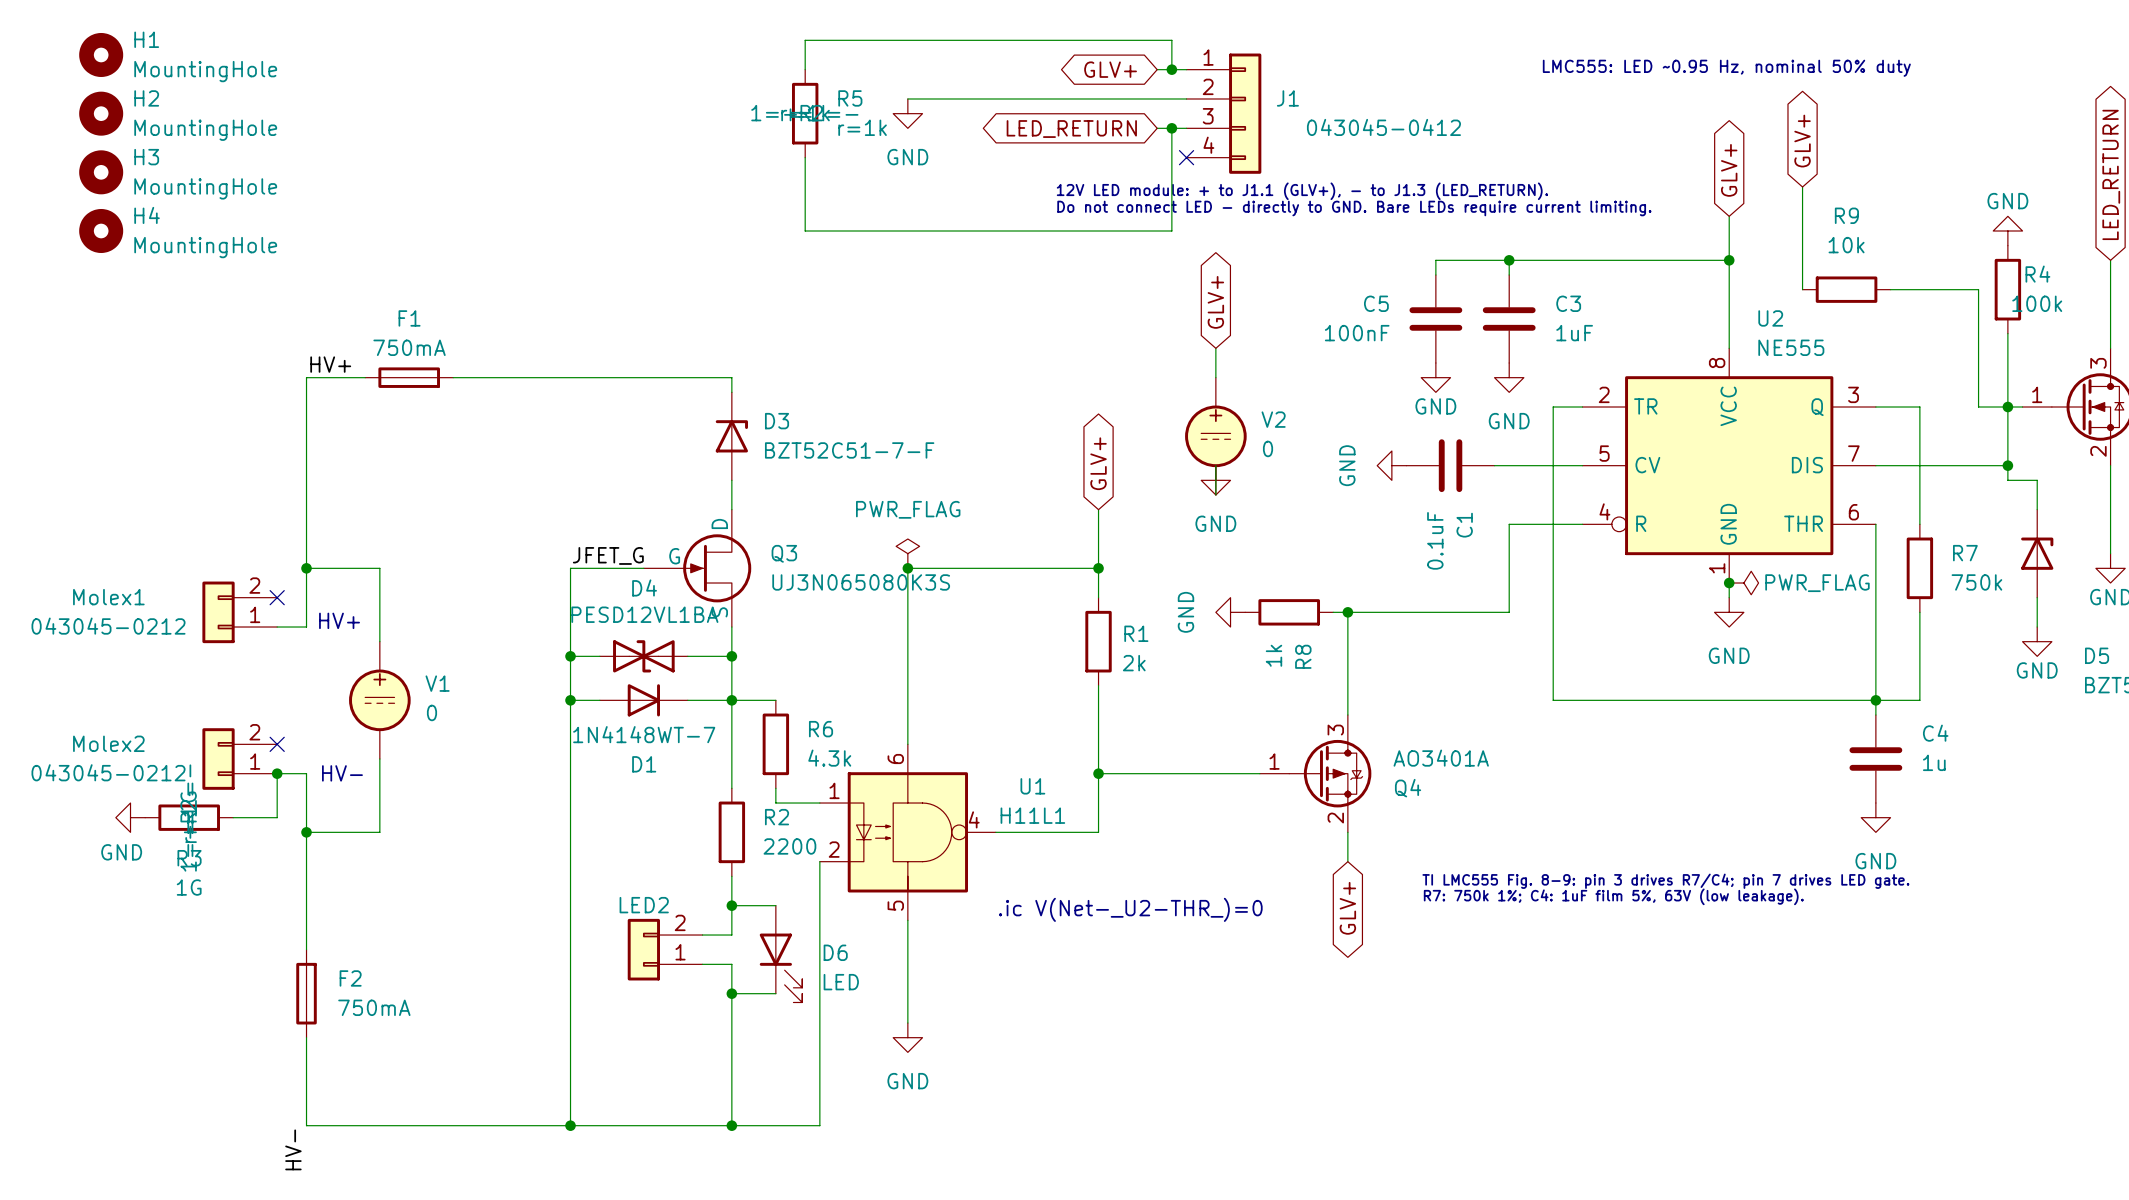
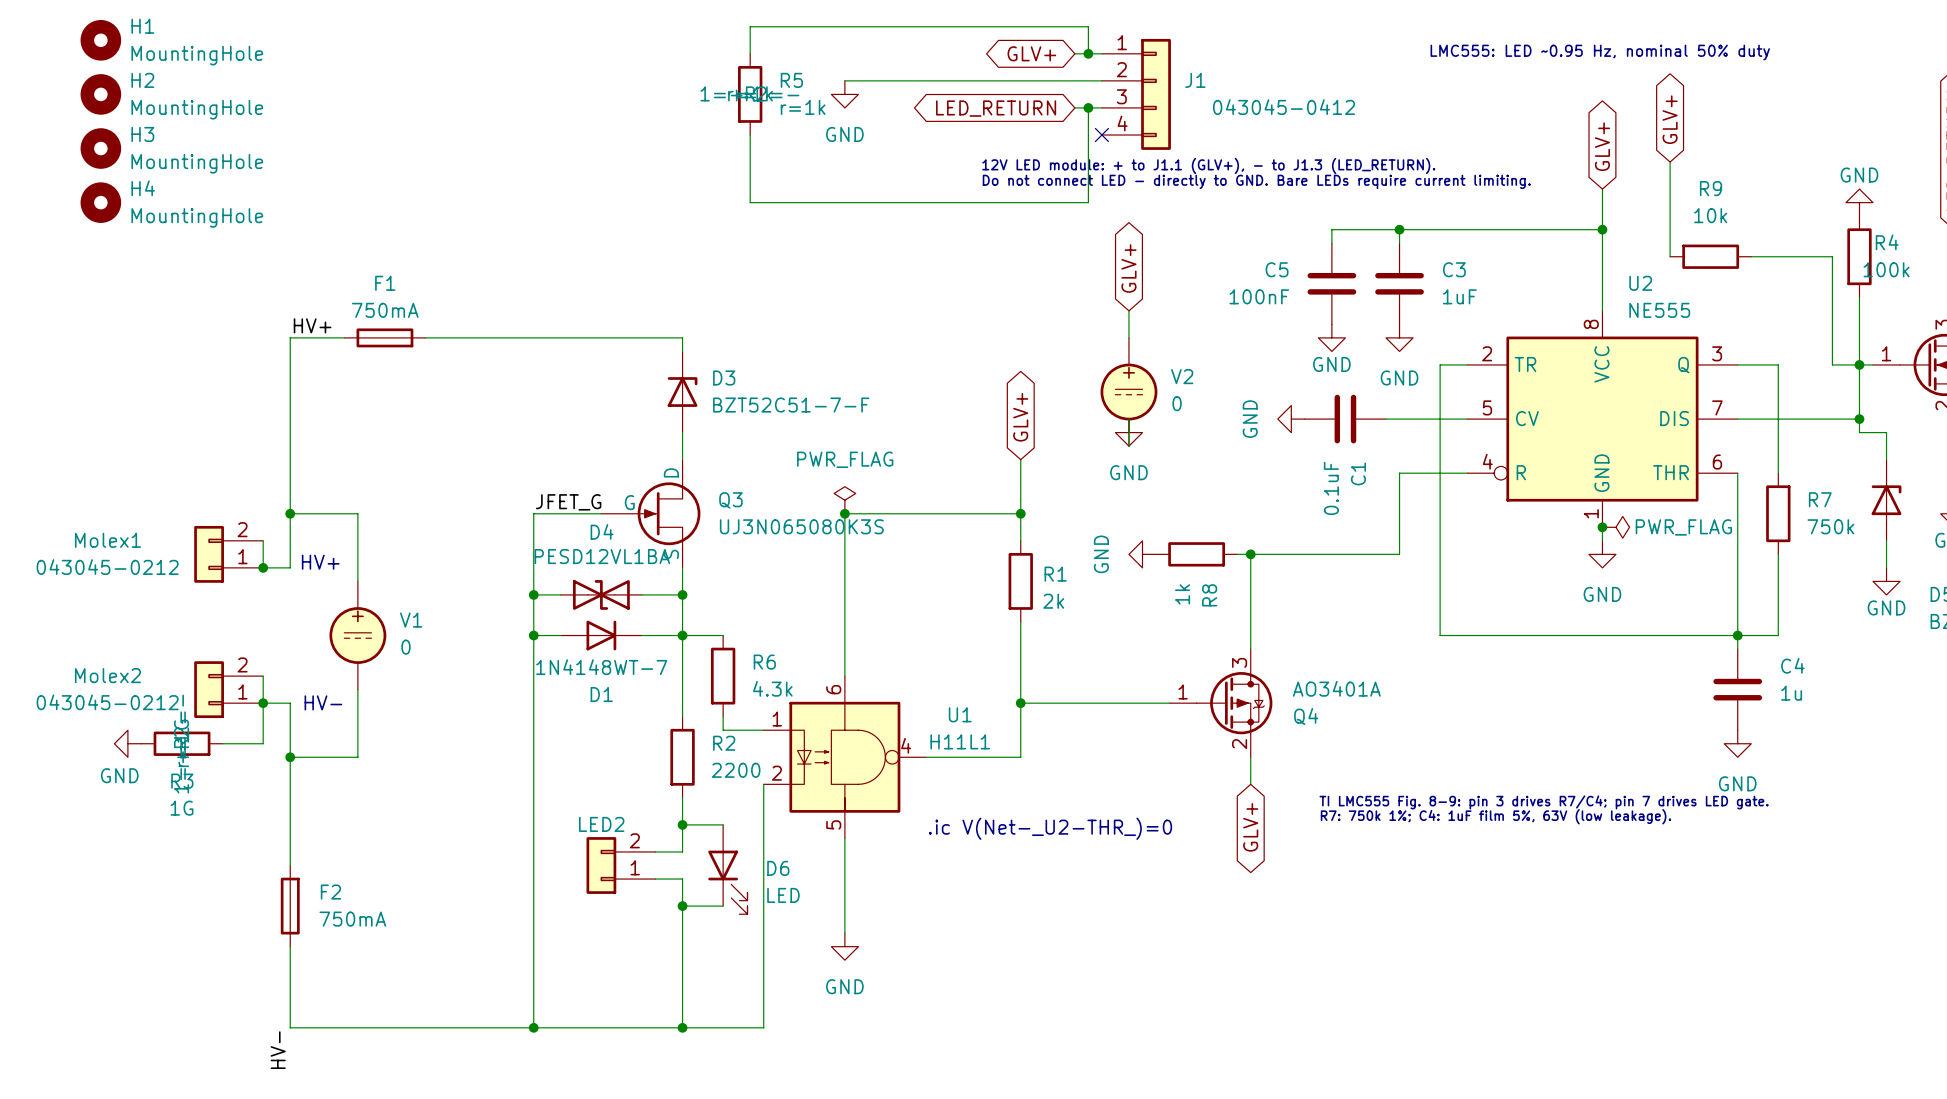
wire: none -> (263, 540) (263, 567)
no-connect mark: (277, 597) -> none
junction: none -> (263, 567)
wire: none -> (263, 676) (263, 703)
no-connect mark: (277, 744) -> none

